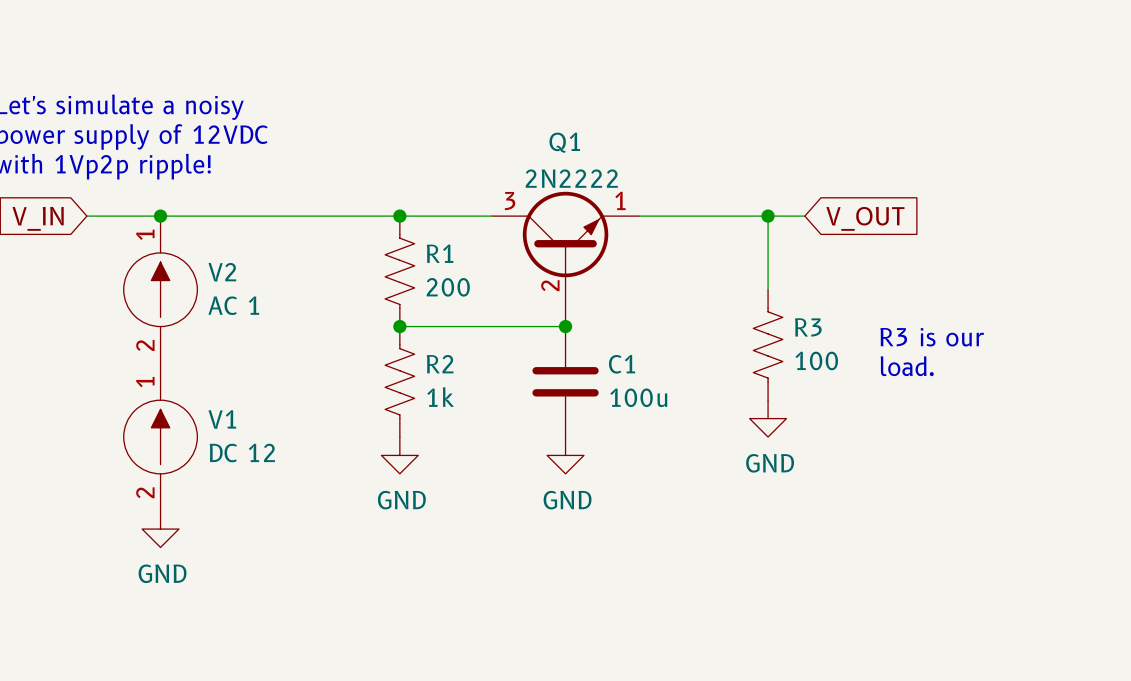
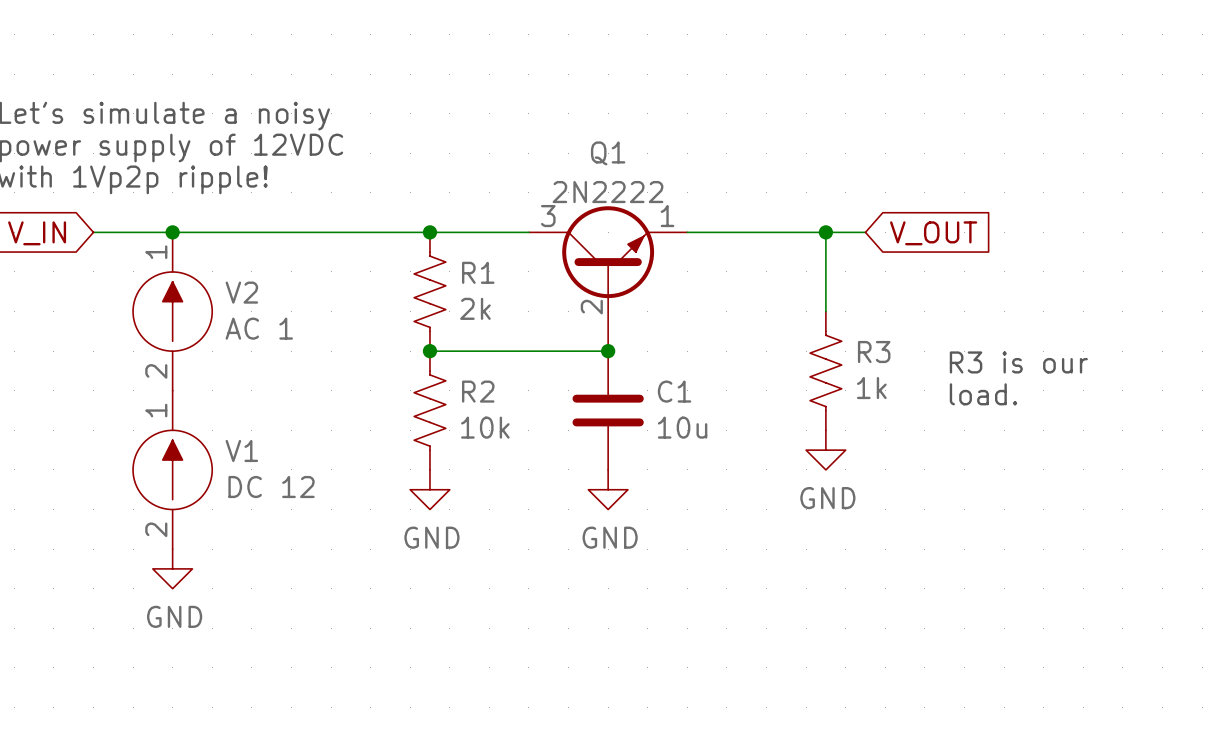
R1 value: 200 (448, 287) -> 2k (475, 308)
R3 value: 100 (816, 360) -> 1k (871, 388)
R2 value: 1k (440, 397) -> 10k (485, 427)
C1 value: 100u (638, 397) -> 10u (682, 427)

